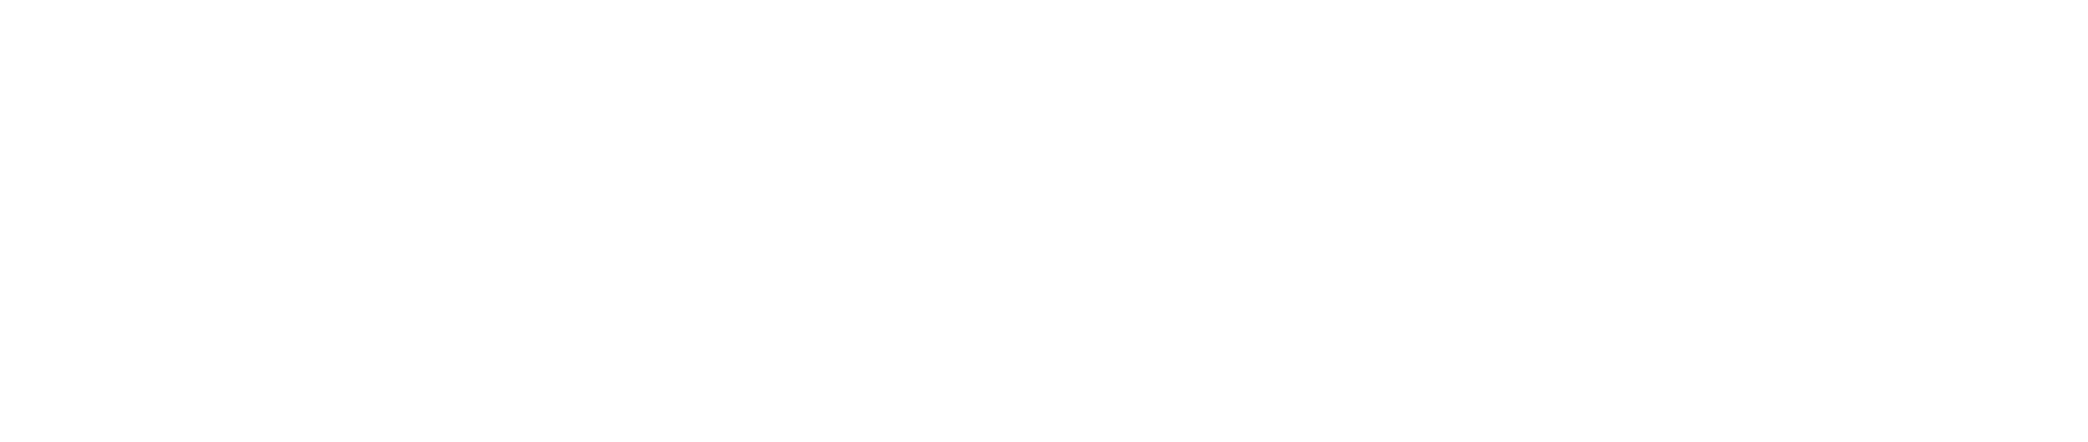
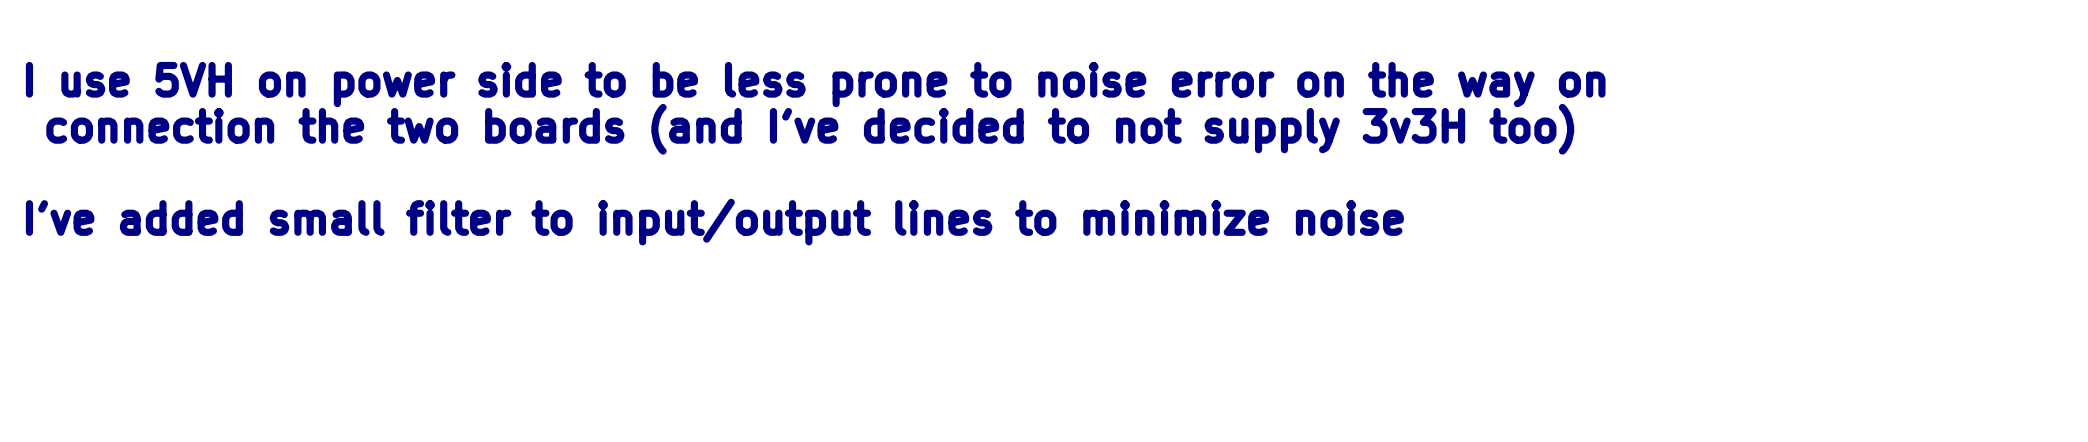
text: none -> I use 5VH on power side to be less prone to noise error on the way on (815, 84)
text: none -> connection the two boards (and I've decided to not supply 3v3H too) (810, 129)
text: none -> I've added small filter to input/output lines to minimize noise (714, 222)

